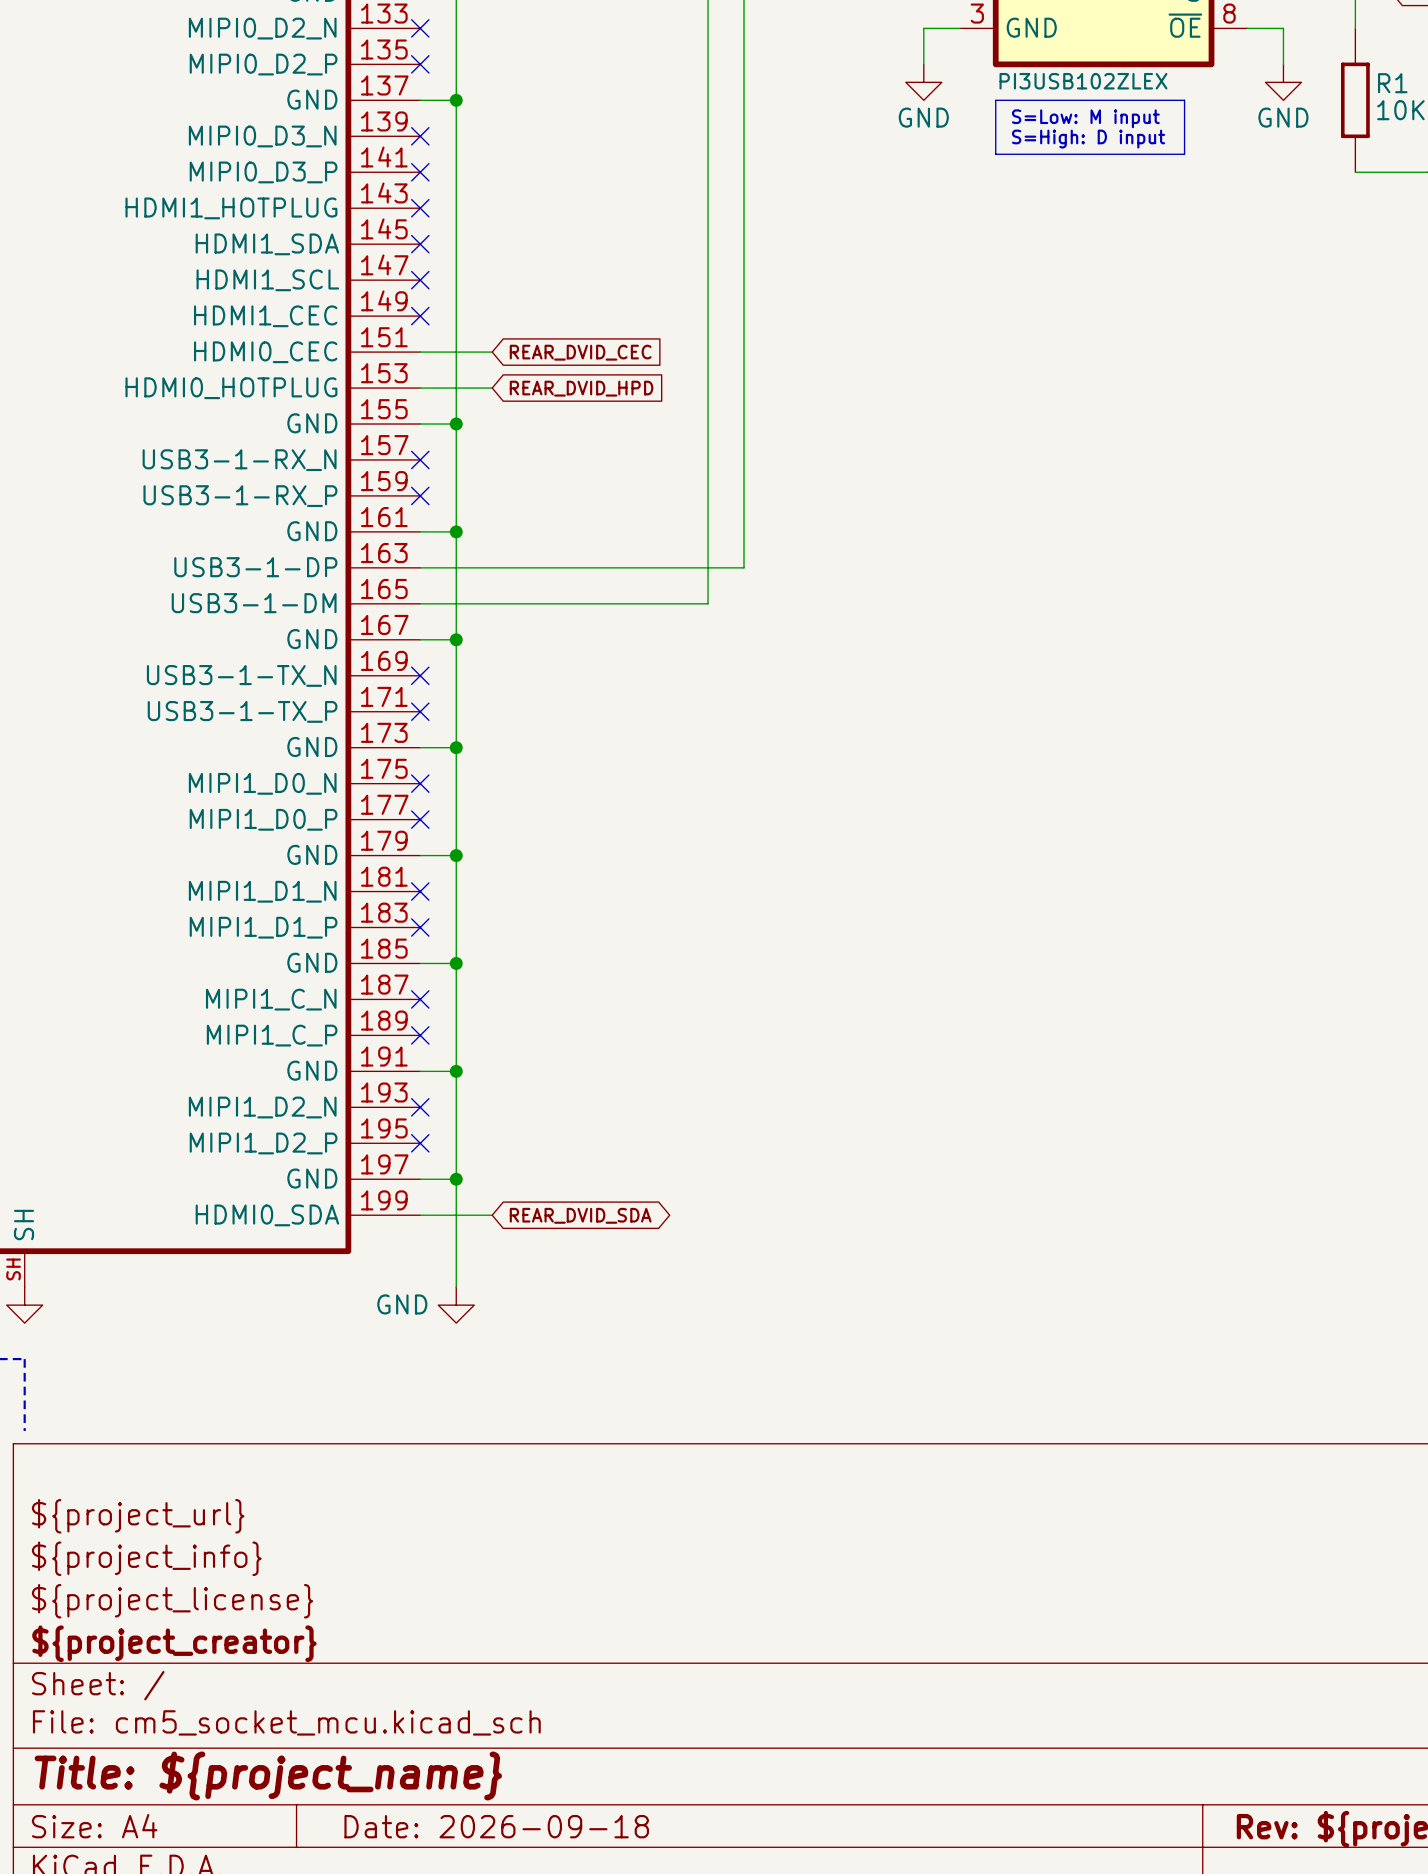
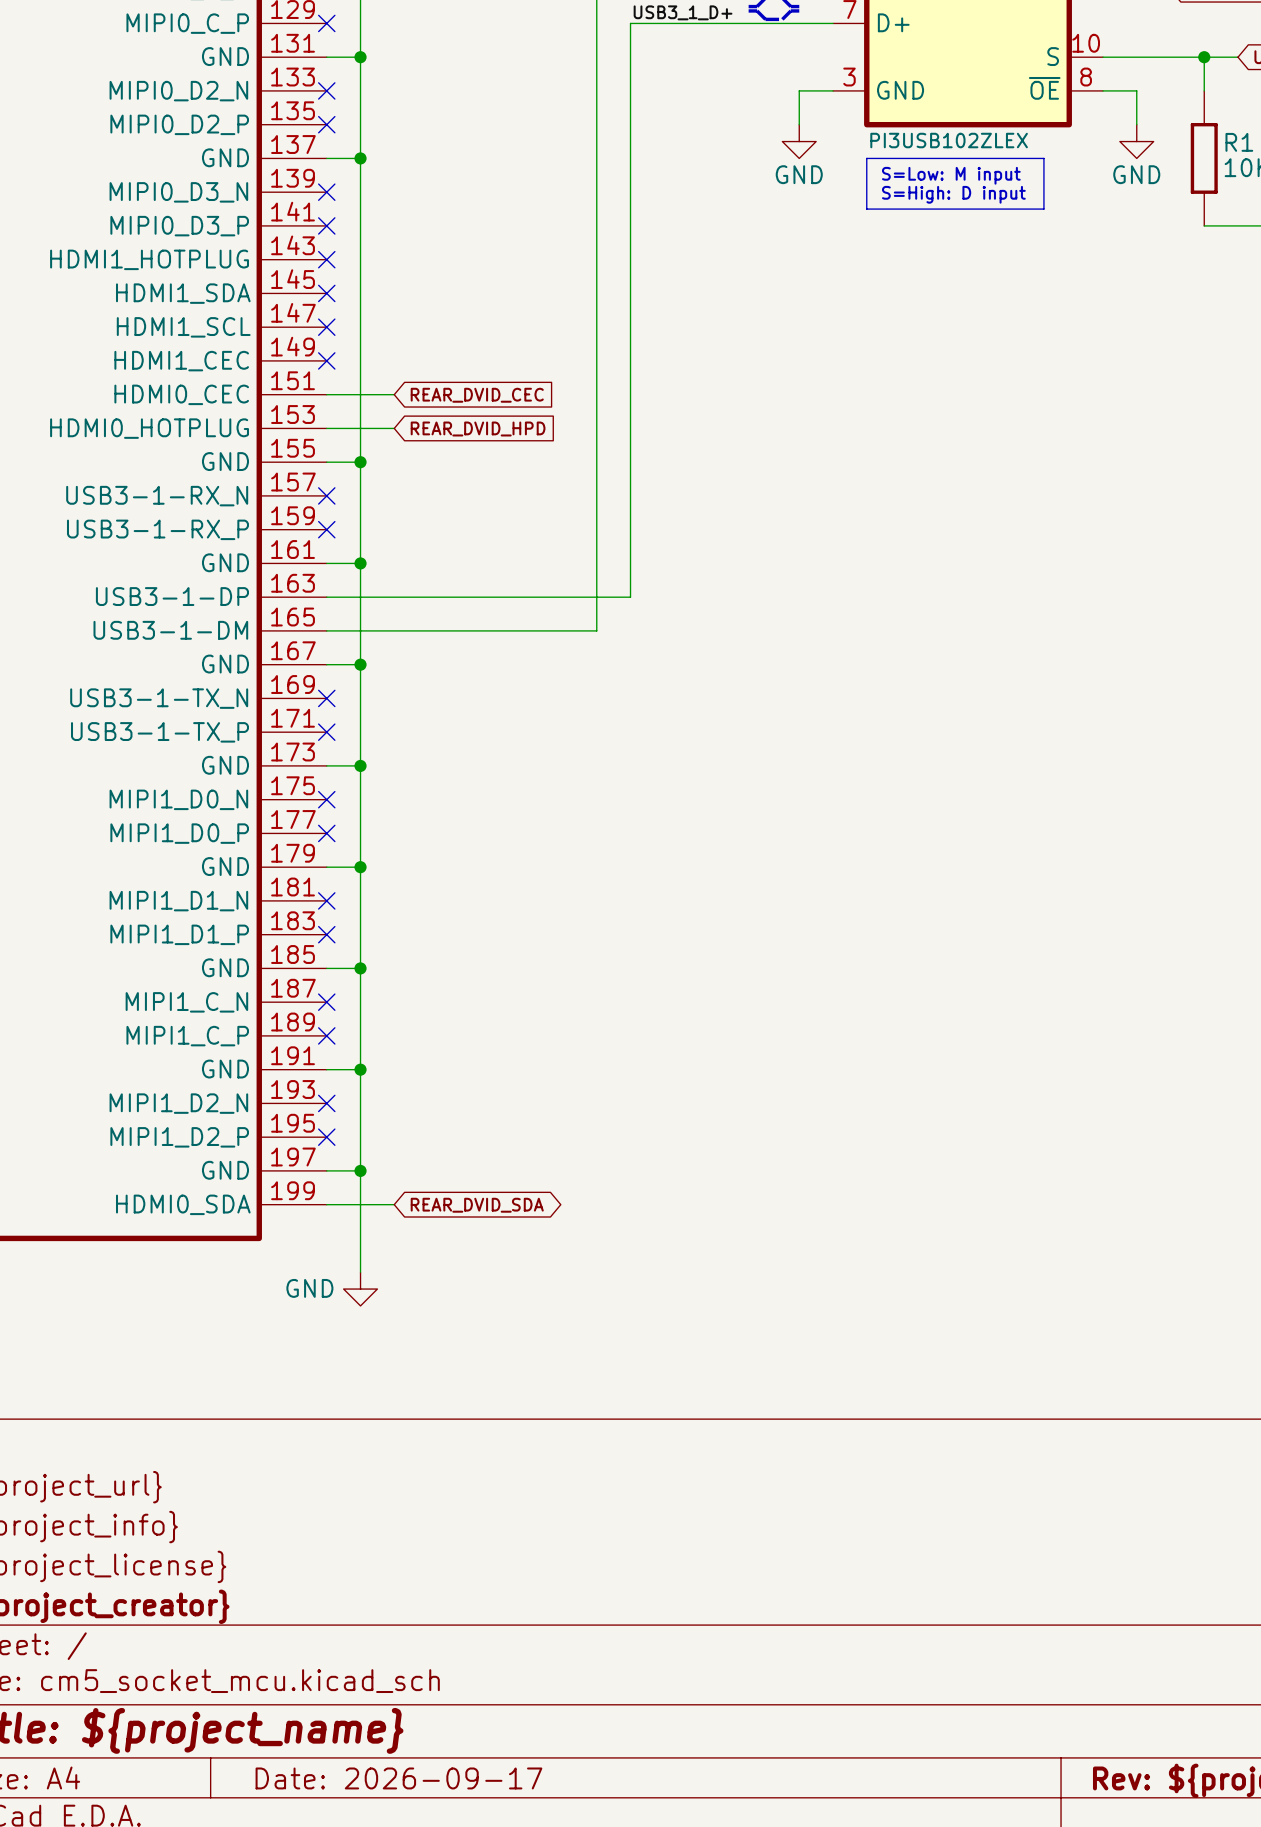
title block: Date: 2026-09-18 (496, 1826) -> Date: 2026-09-17 (398, 1778)

